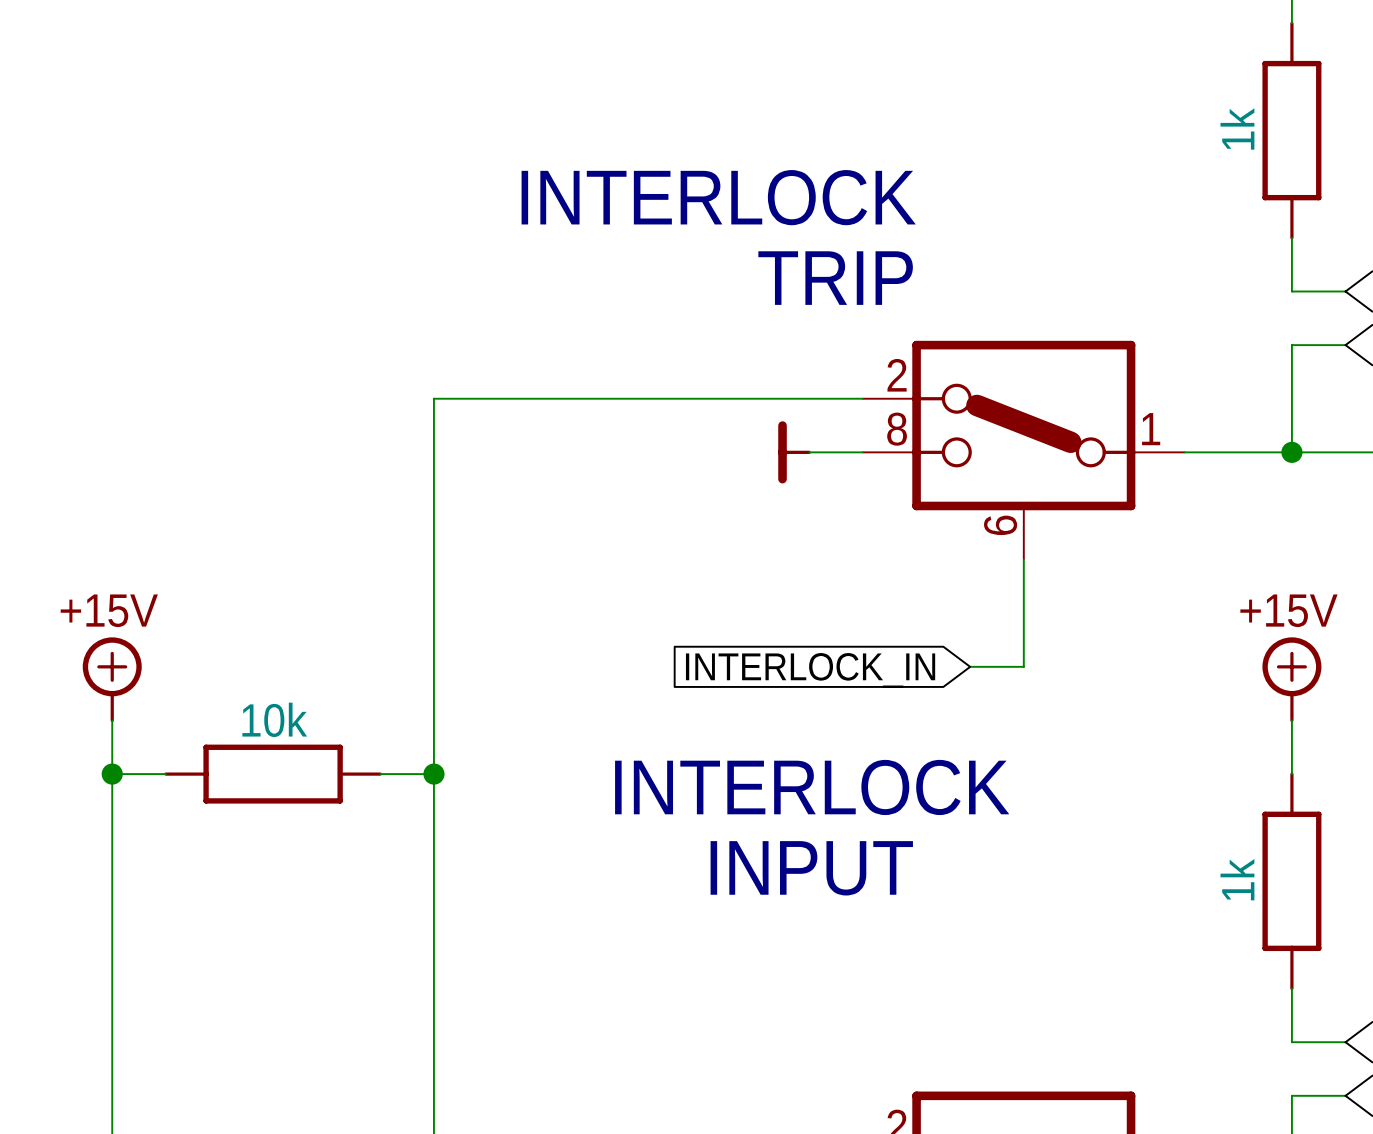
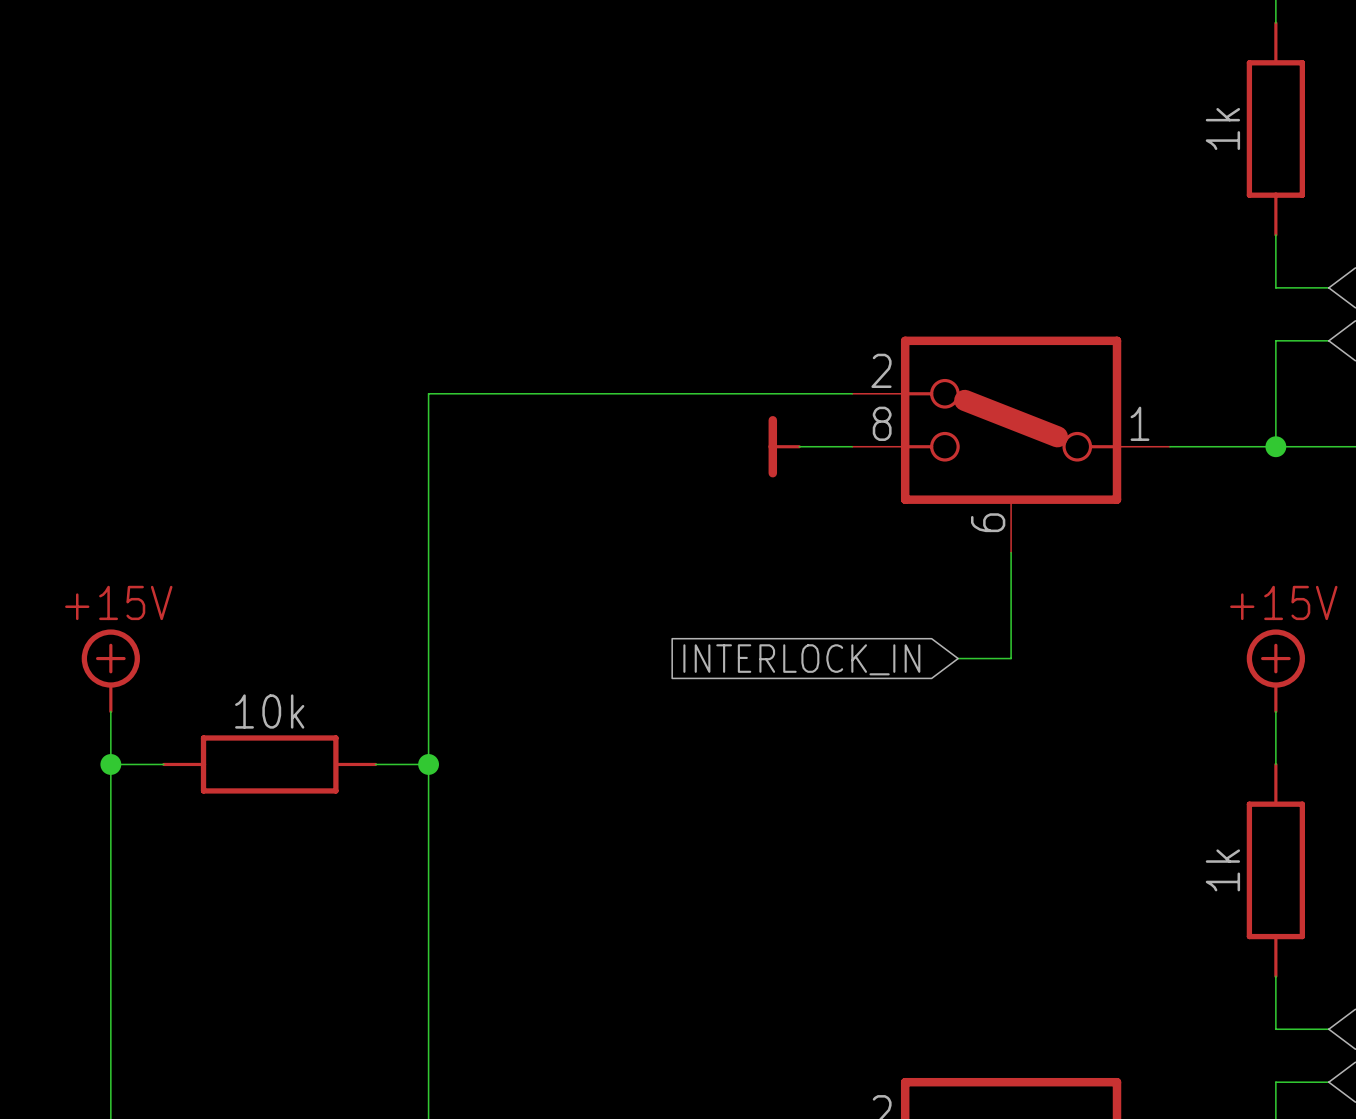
text: INTERLOCK (718, 197) -> none
text: TRIP (835, 278) -> none
text: INTERLOCK (812, 787) -> none
text: INPUT (811, 868) -> none

